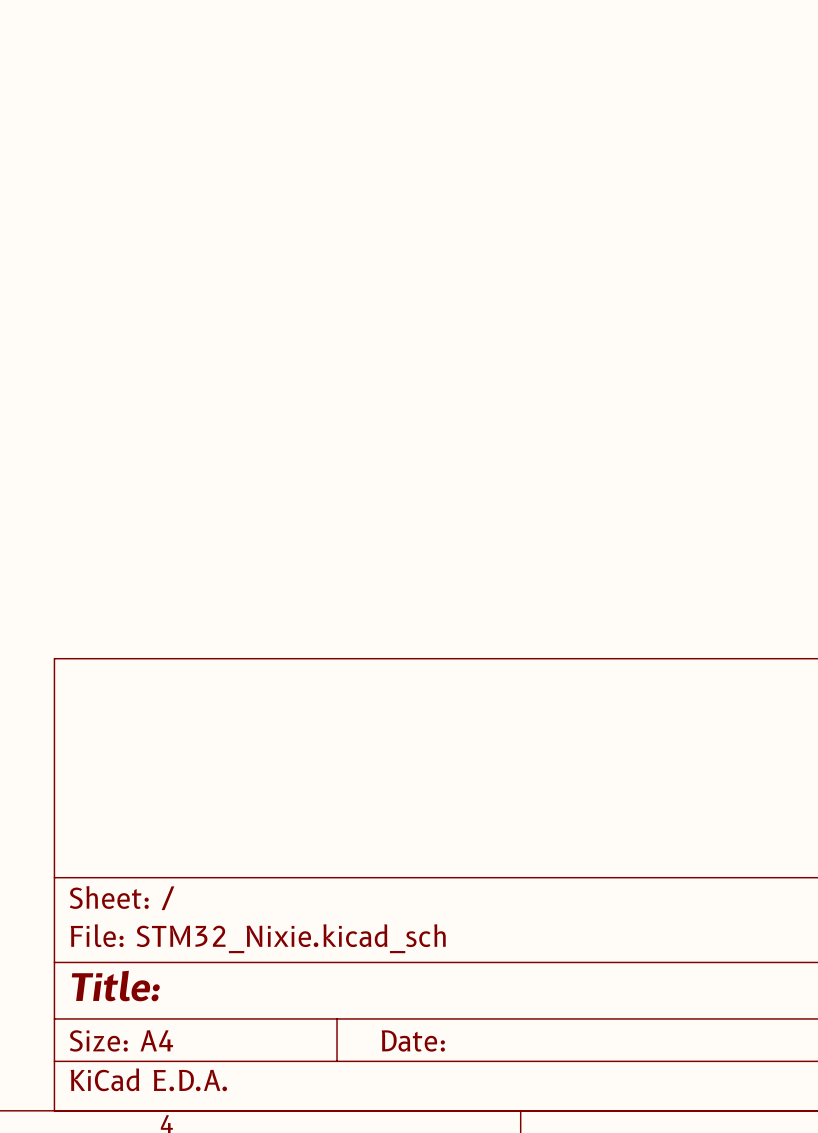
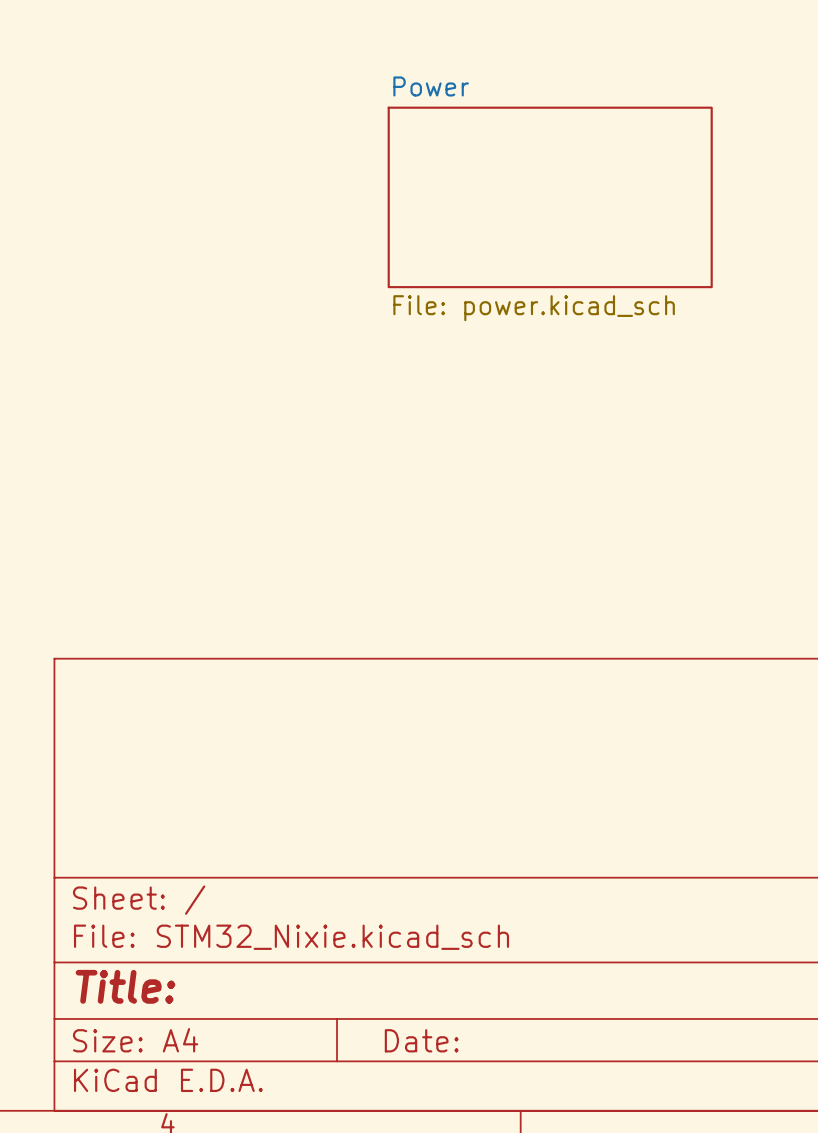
sheet Power: none -> File: power.kicad_sch (550, 197)

